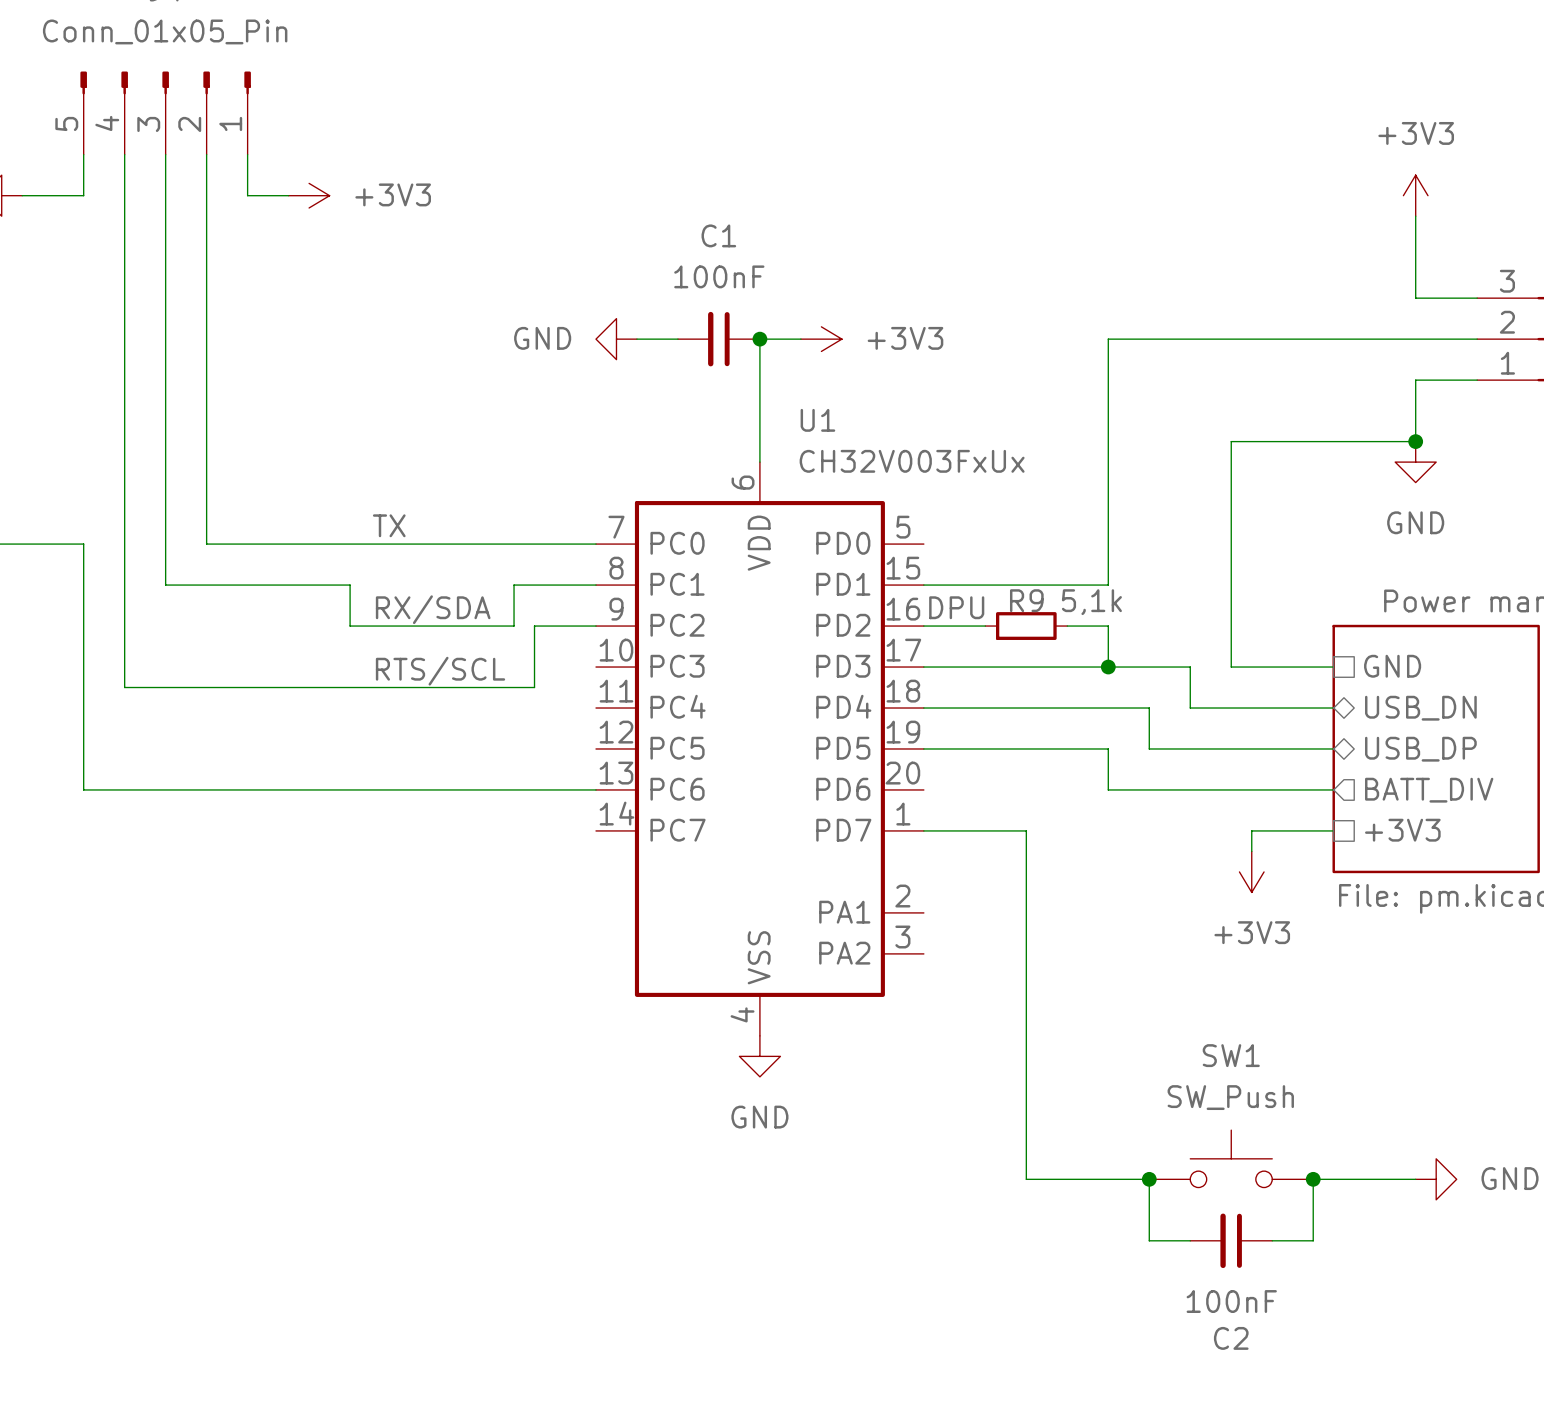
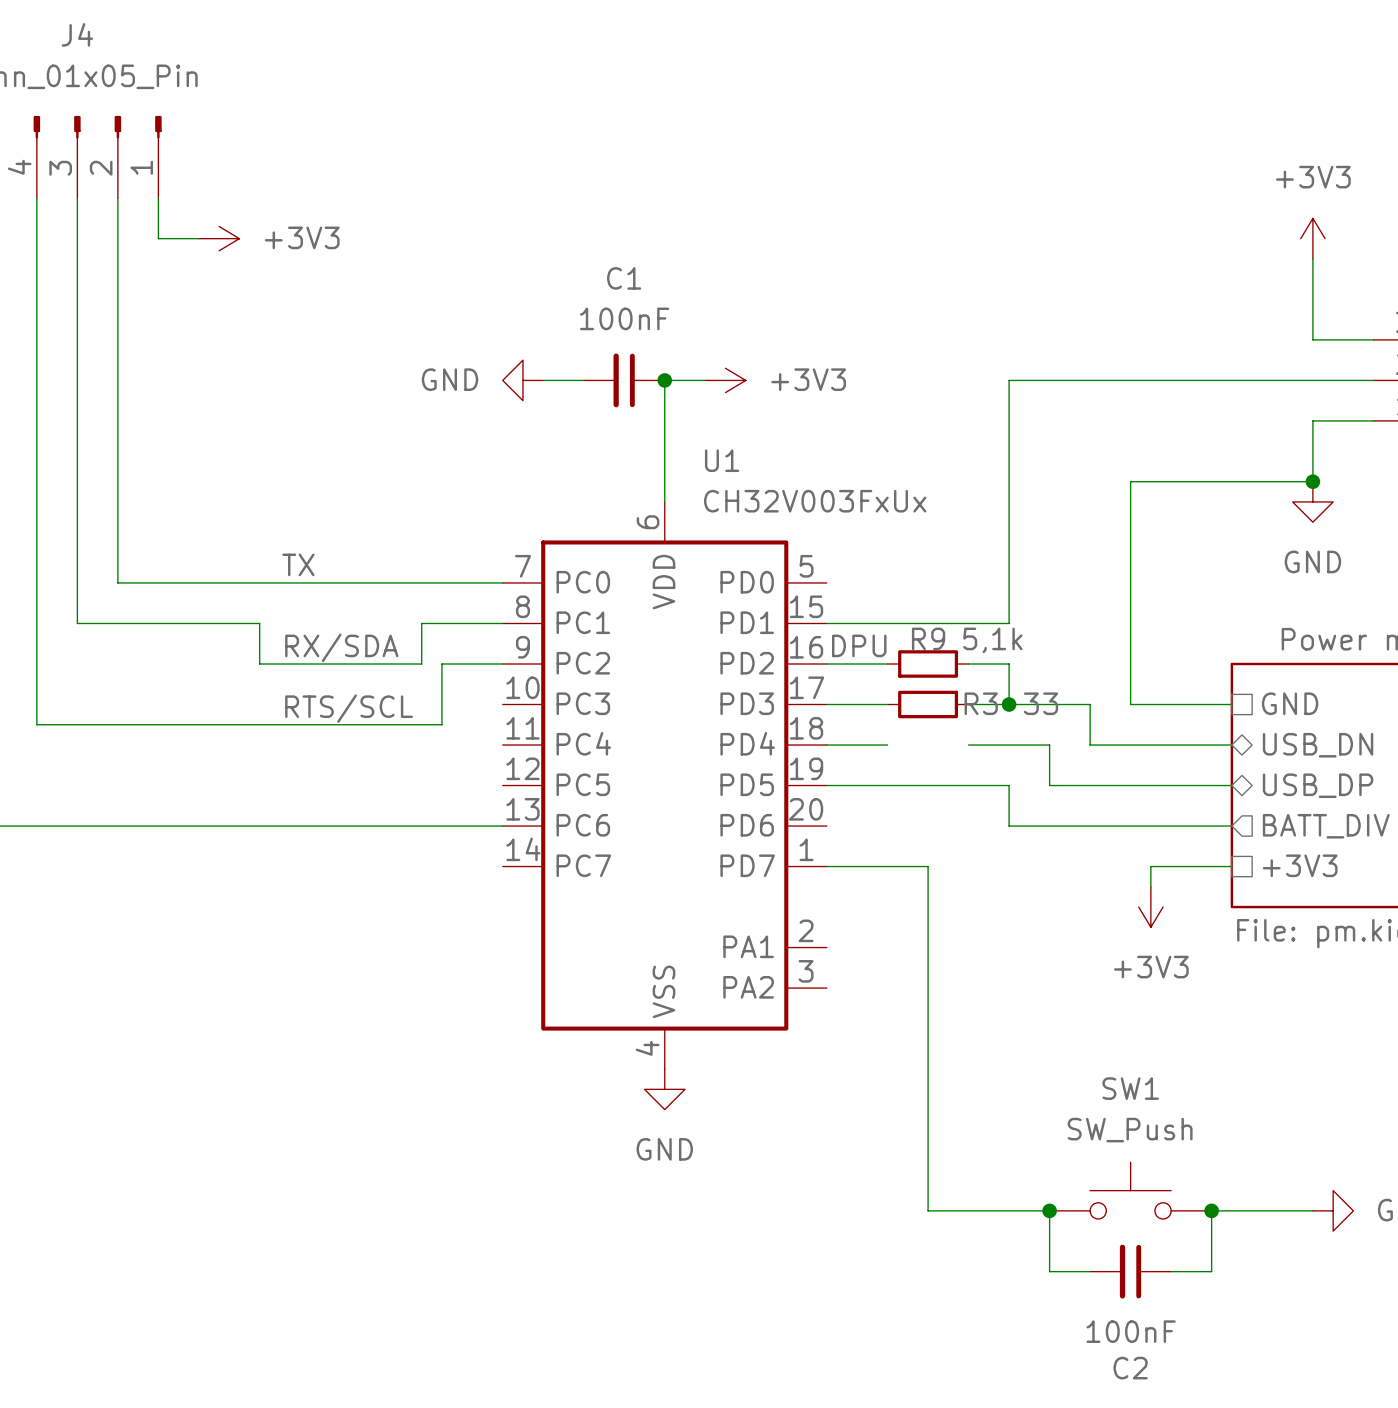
wire: (985, 667) (1067, 667) -> none
R3: none -> 33 (928, 704)
wire: (985, 708) (1067, 708) -> none

